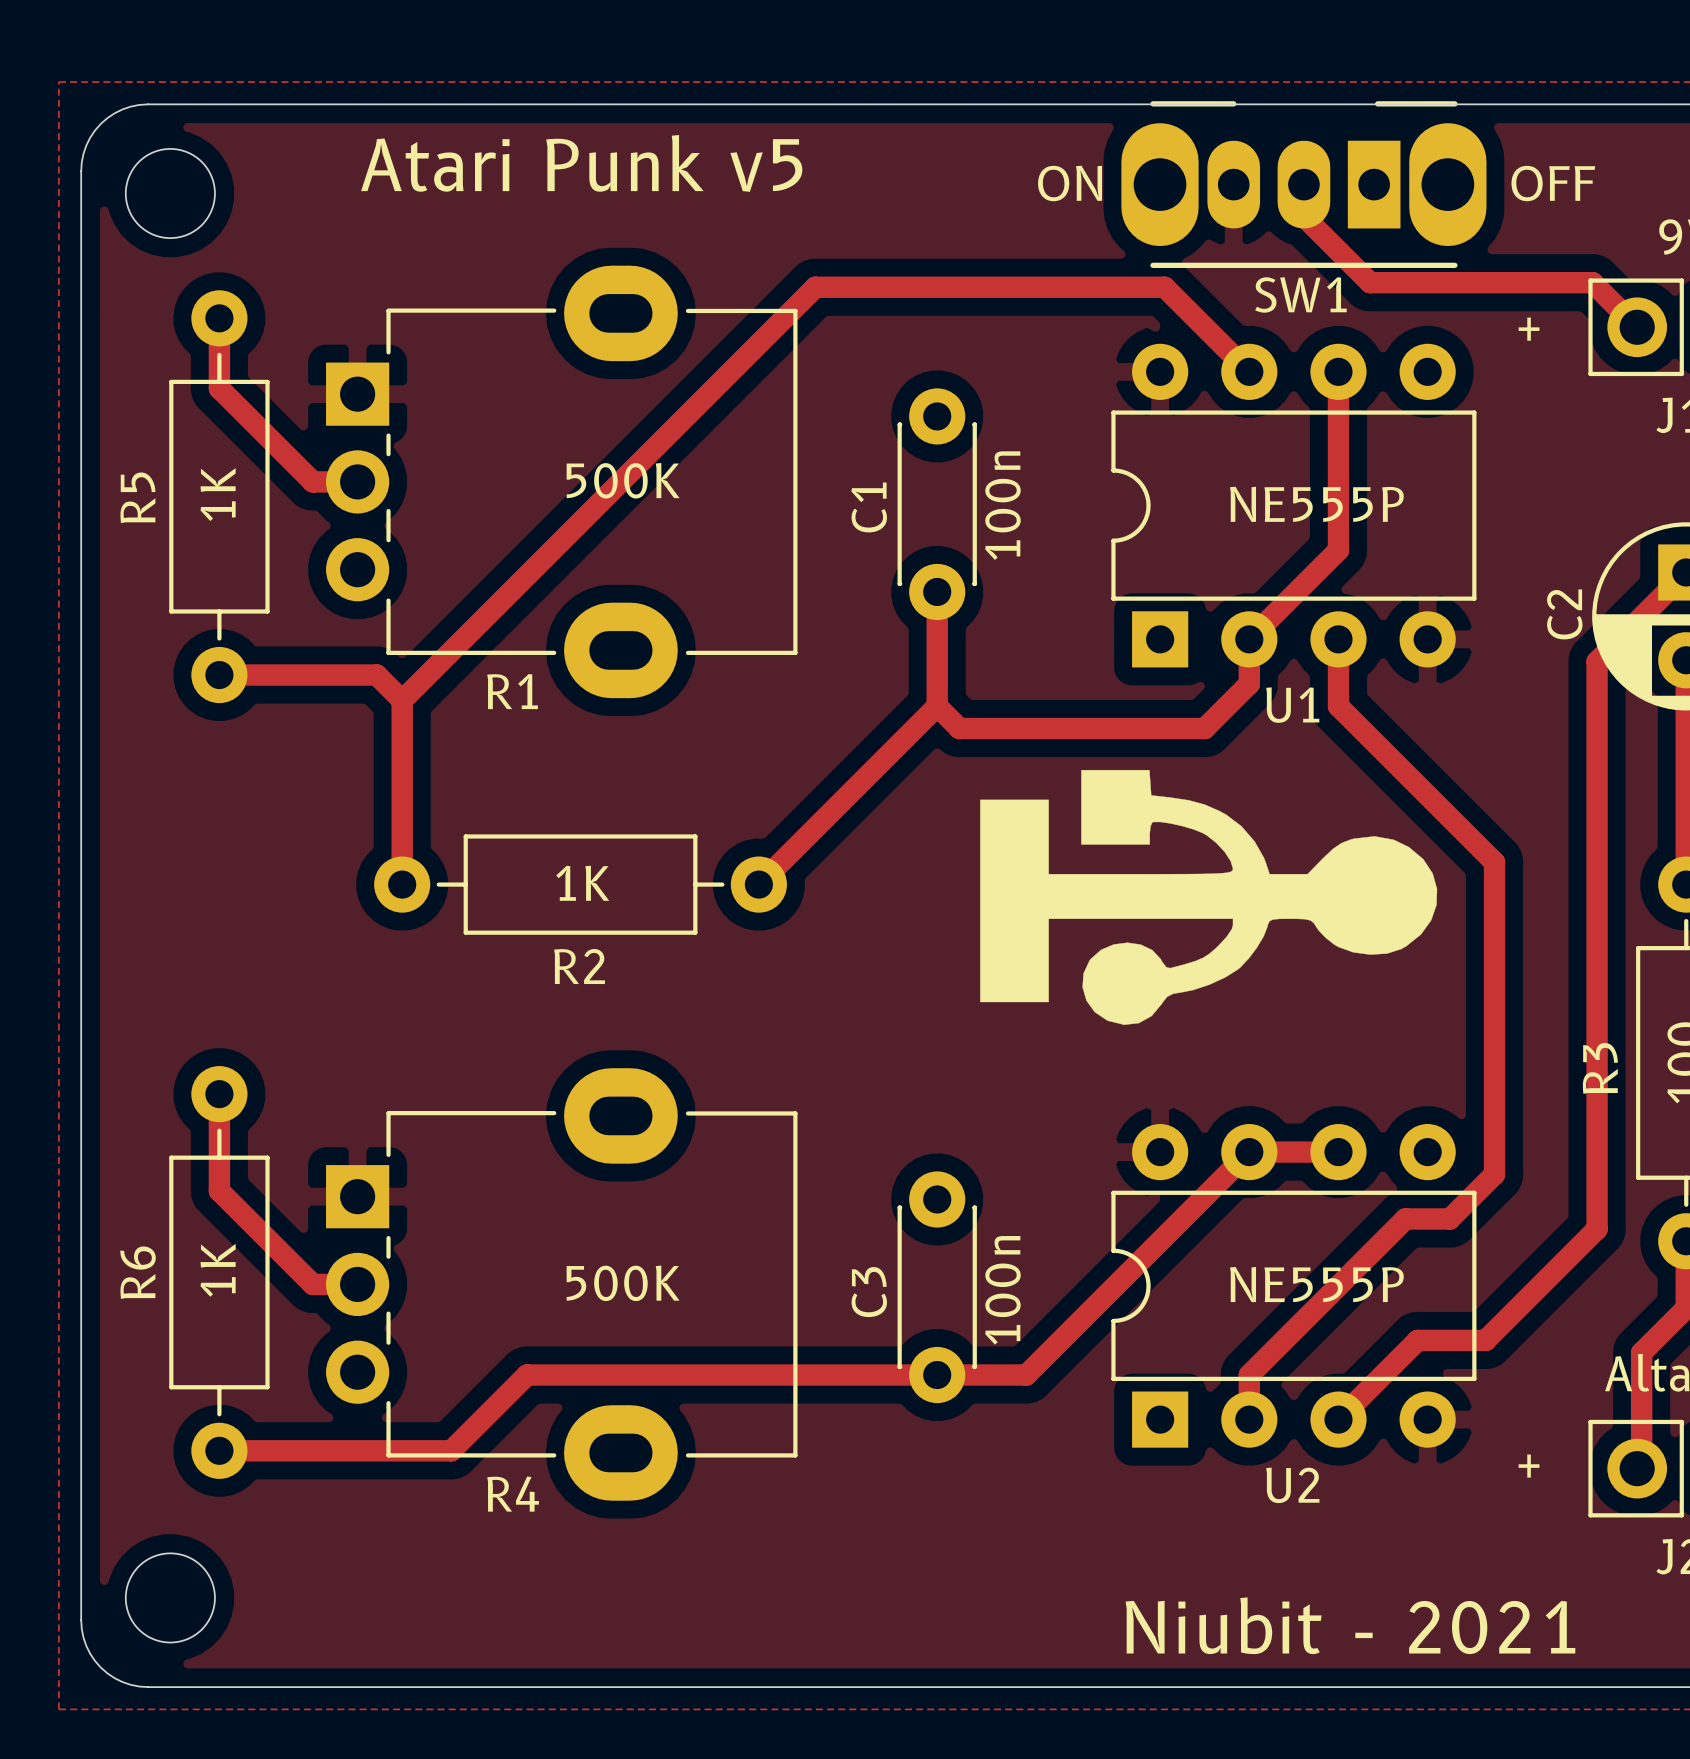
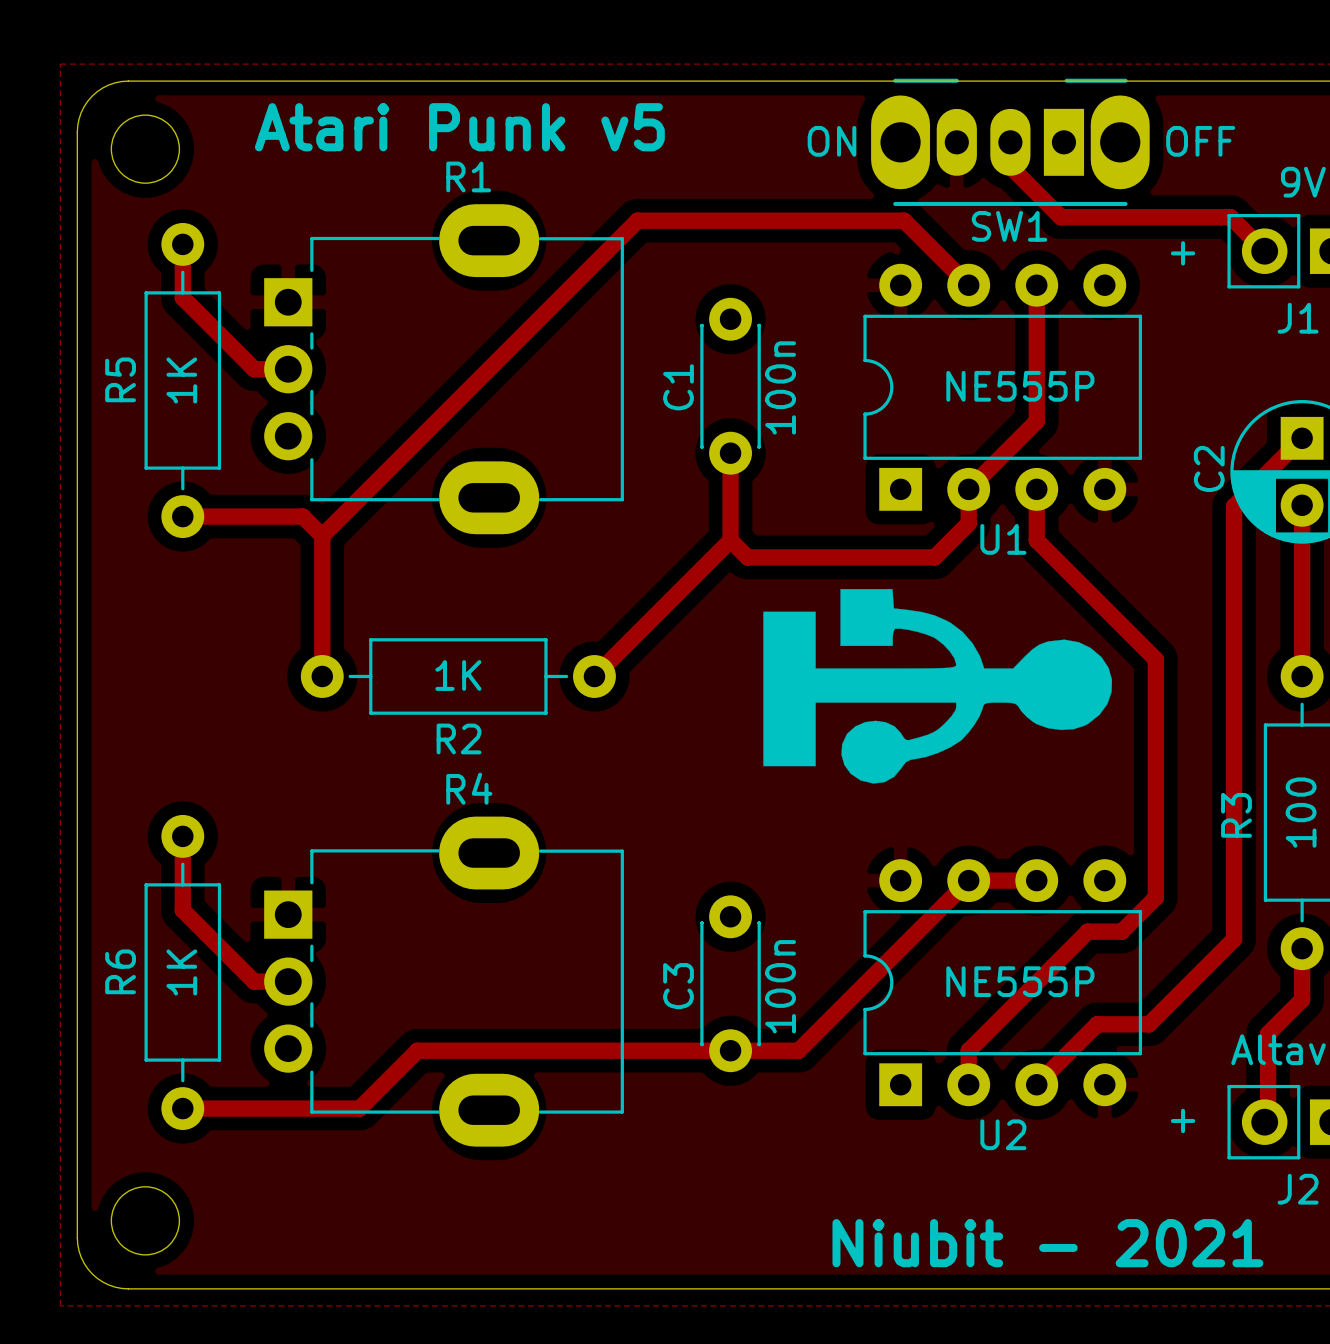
R1 footprint: [326, 265, 798, 699] -> [264, 204, 624, 535]
R1 value: 500K (623, 480) -> none
R1 name position: R1 (512, 691) -> R1 (468, 176)
R4 footprint: [326, 1068, 798, 1501] -> [264, 816, 624, 1147]
R4 value: 500K (623, 1283) -> none
R4 name position: R4 (513, 1494) -> R4 (469, 788)

